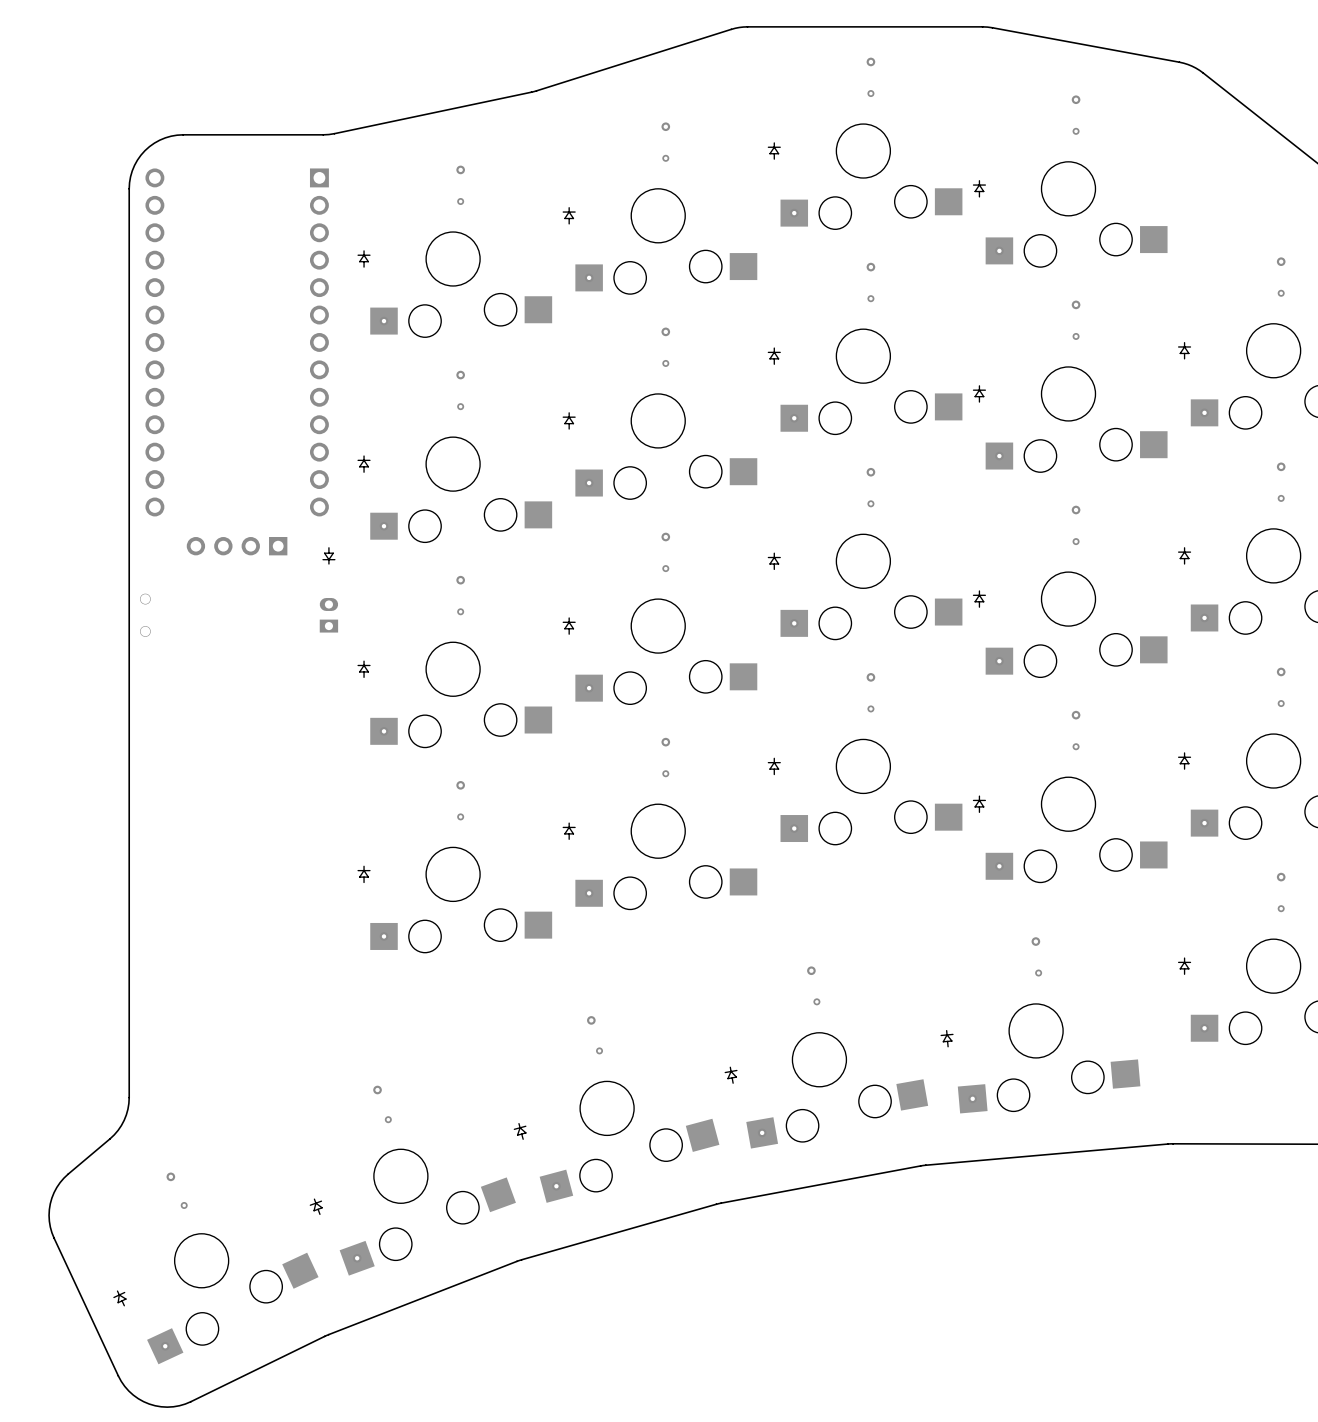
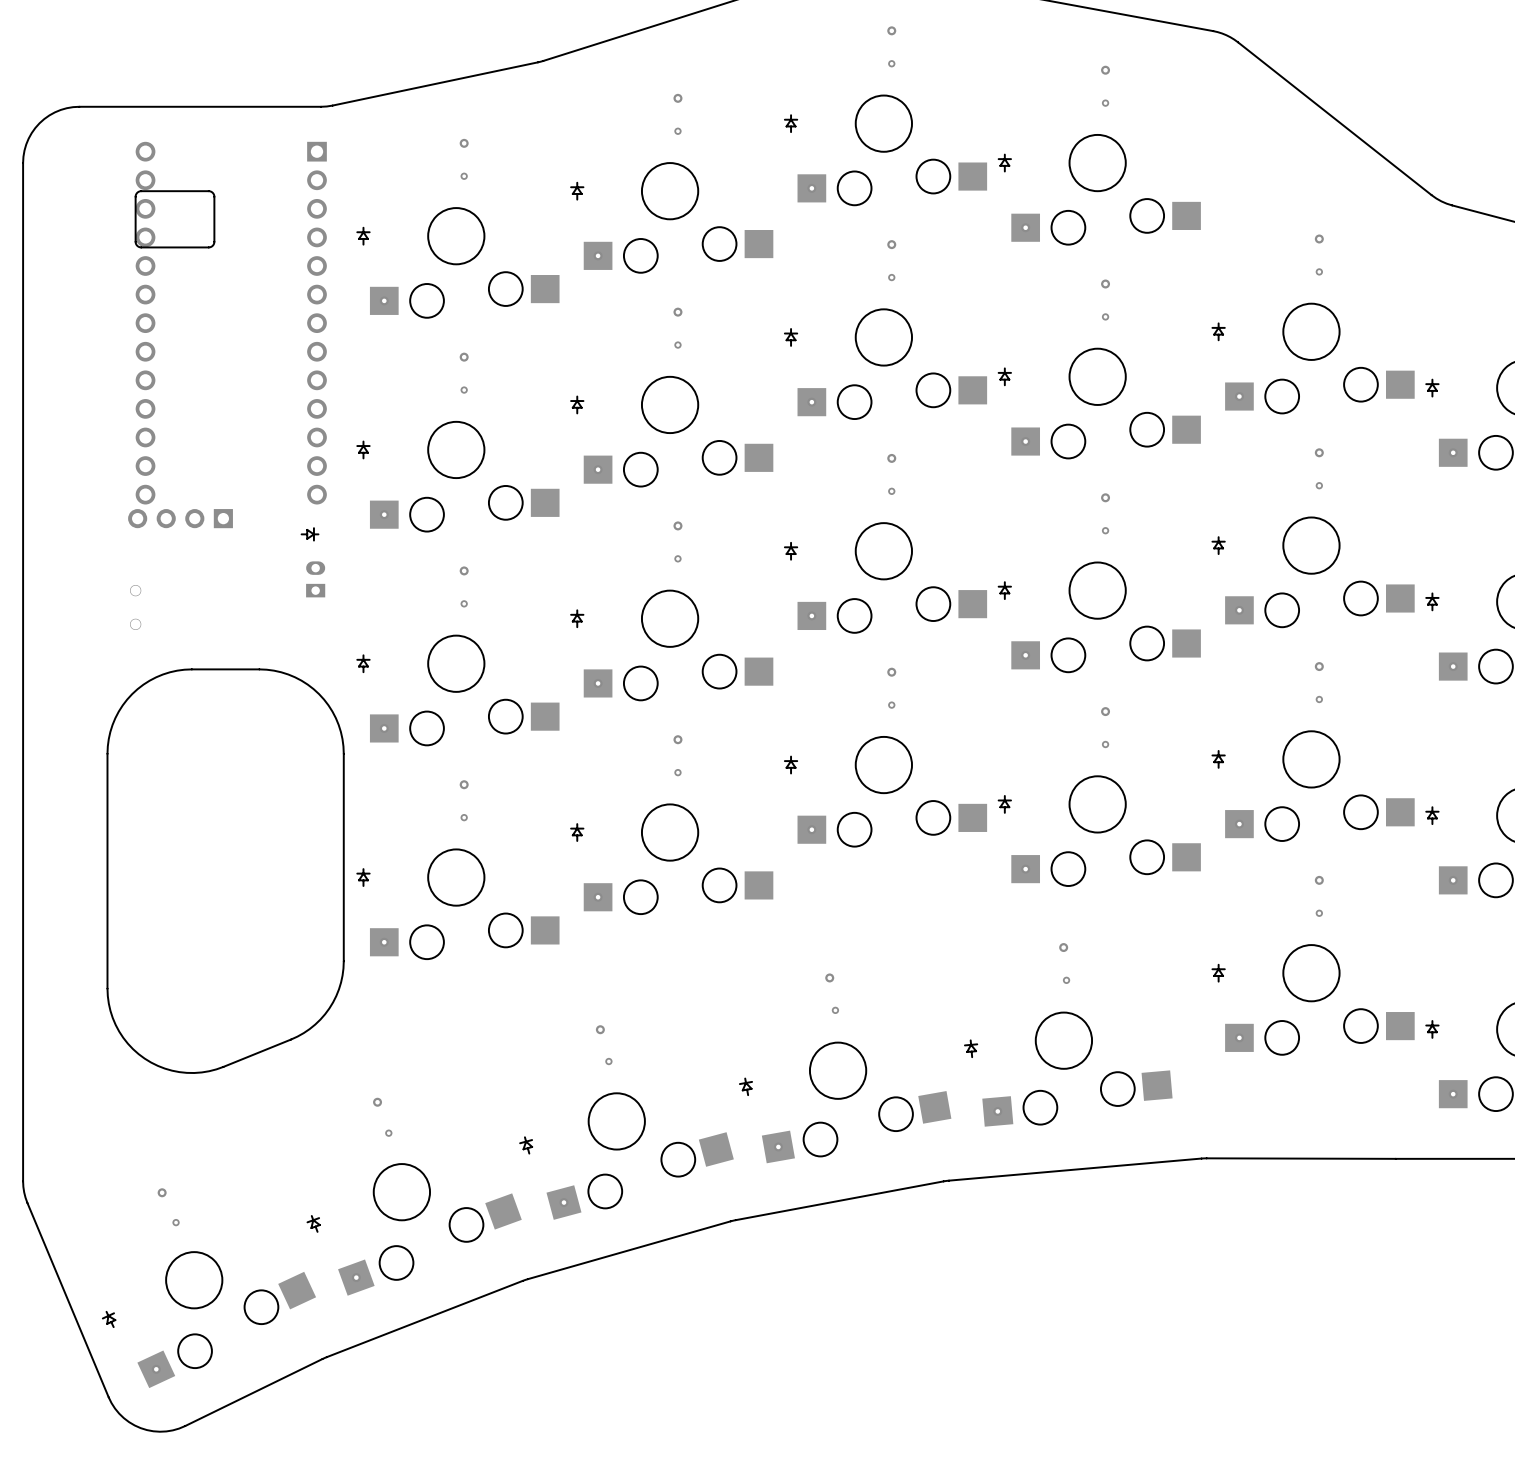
board edge: (183, 134) (165, 137) (145, 150) (132, 170) (129, 188) (128, 1103) (124, 1120) (114, 1134) (60, 1182) (51, 1198) (49, 1215) (54, 1238) (124, 1386) (138, 1398) (155, 1405) (173, 1406) (193, 1400) -> (175, 106) (79, 106) (60, 109) (49, 115) (35, 127) (26, 144) (23, 156) (23, 1181) (27, 1203) (115, 1408) (129, 1422) (146, 1430) (166, 1431) (185, 1426)
board edge: none -> (208, 191) (137, 192) (135, 196) (136, 245) (141, 247) (212, 246) (214, 241) (214, 196) (212, 192) (208, 191)
part position: (237, 546) -> (180, 518)
part rotation: 0° (328, 555) -> 90° counterclockwise (310, 534)
part position: (328, 555) -> (310, 534)
part position: (328, 615) -> (315, 579)
board edge: none -> (259, 669) (184, 669) (156, 677) (137, 689) (122, 705) (112, 724) (108, 739) (108, 1003) (115, 1024) (133, 1049) (151, 1062) (172, 1070) (194, 1073) (216, 1069) (297, 1036) (309, 1029) (325, 1014) (336, 996) (341, 982) (343, 961) (343, 753) (340, 731) (332, 711) (313, 689) (288, 674) (259, 669)

